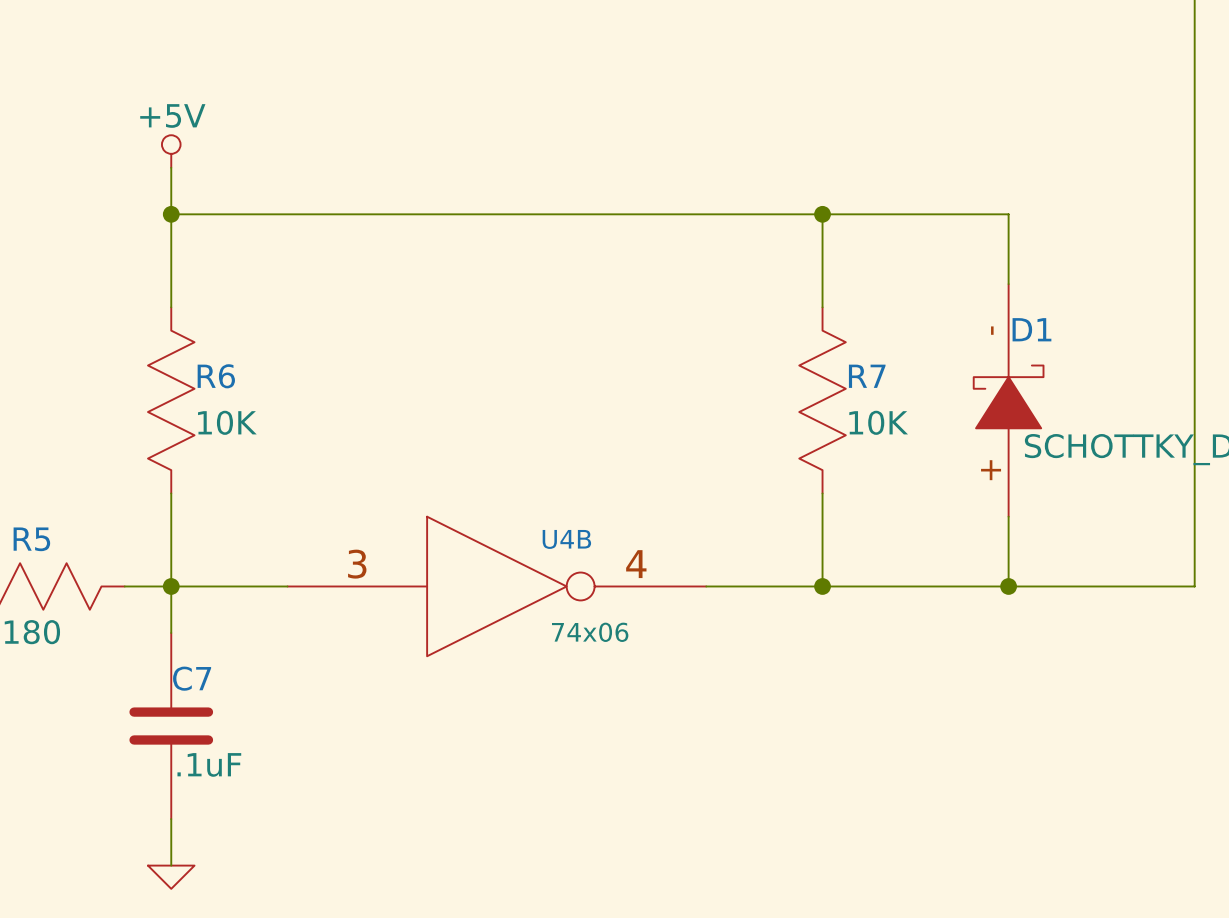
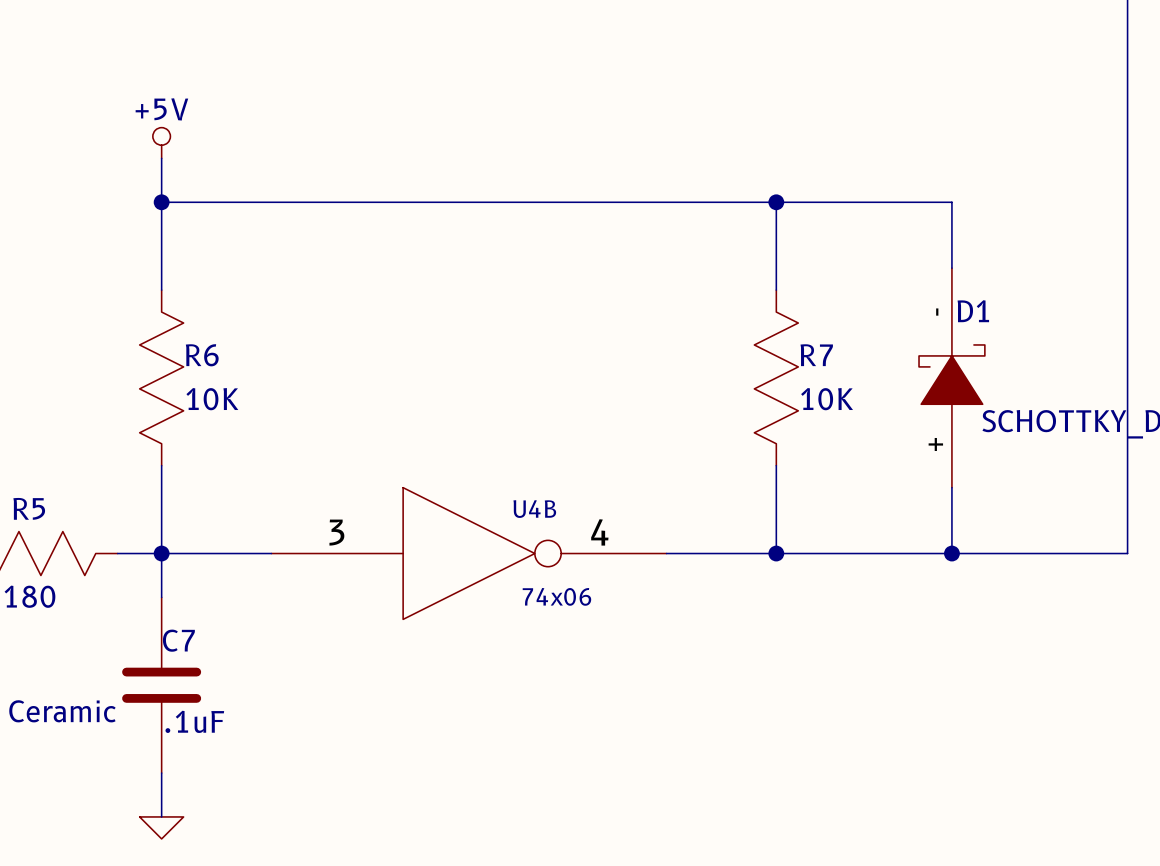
text: none -> Ceramic (62, 711)

